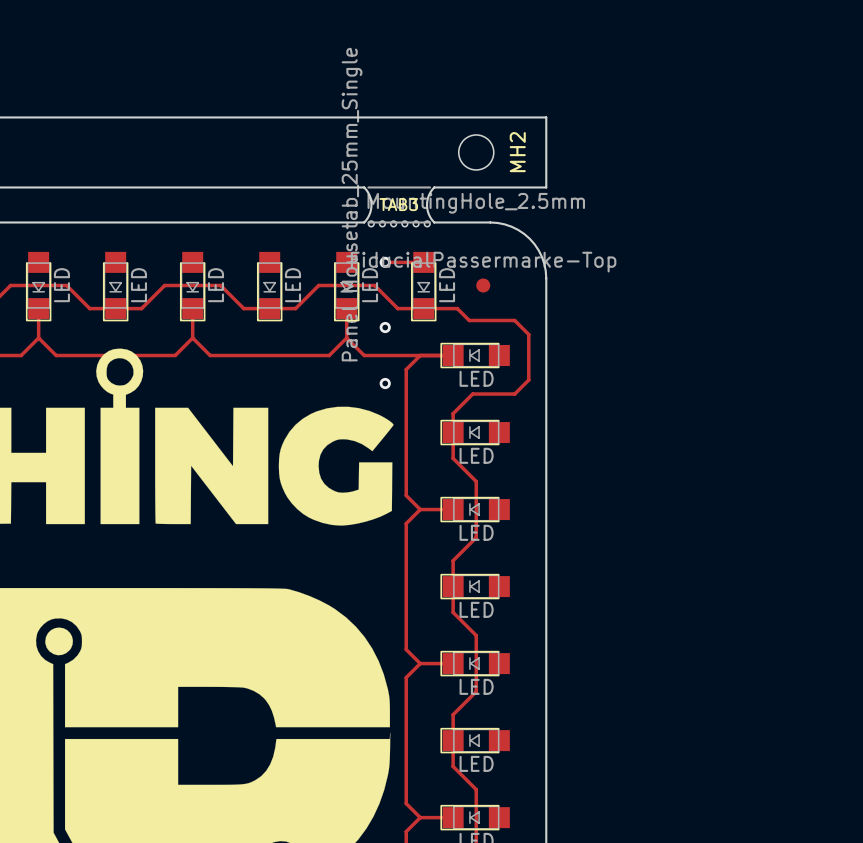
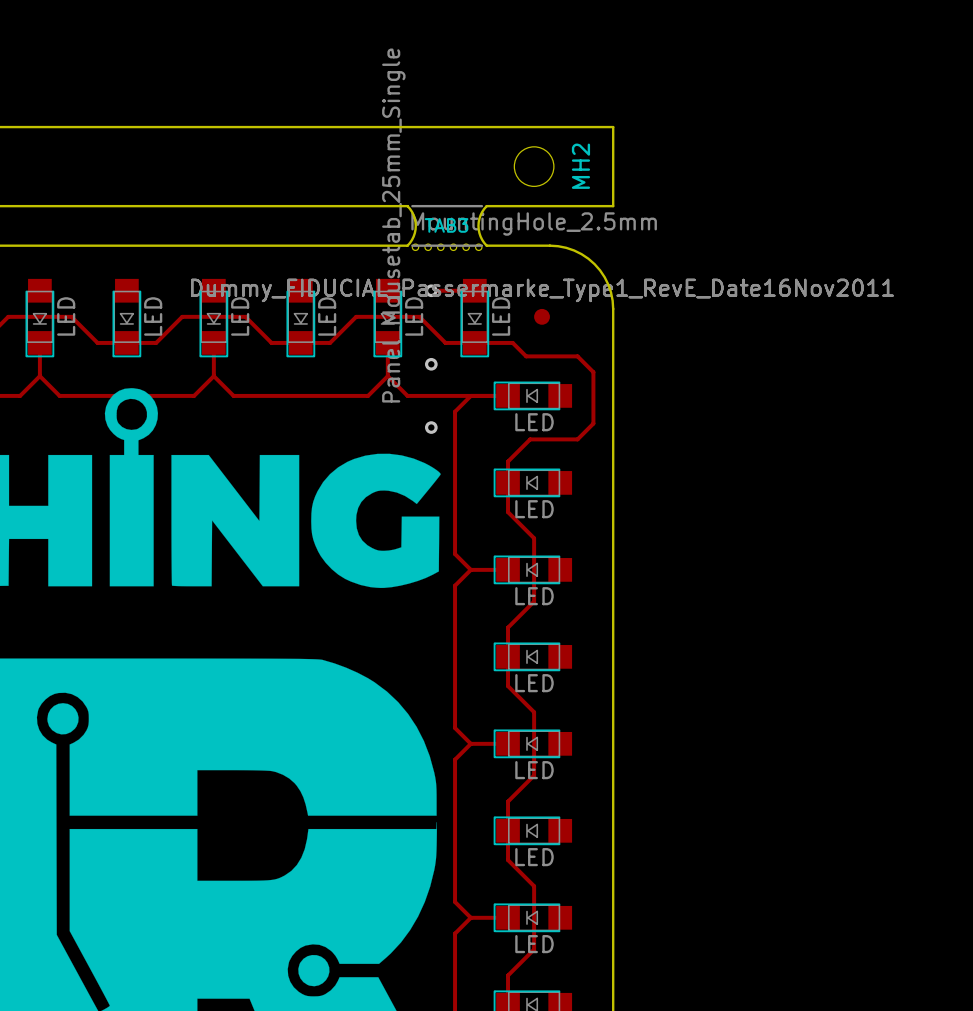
part value: FiducialPassermarke-Top (483, 262) -> Dummy_FIDUCIAL_Passermarke_Type1_RevE_Date16Nov2011 (542, 290)
part: none -> Dummy_FIDUCIAL_Passermarke_Type1_RevE_Date16Nov2011 (542, 290)

